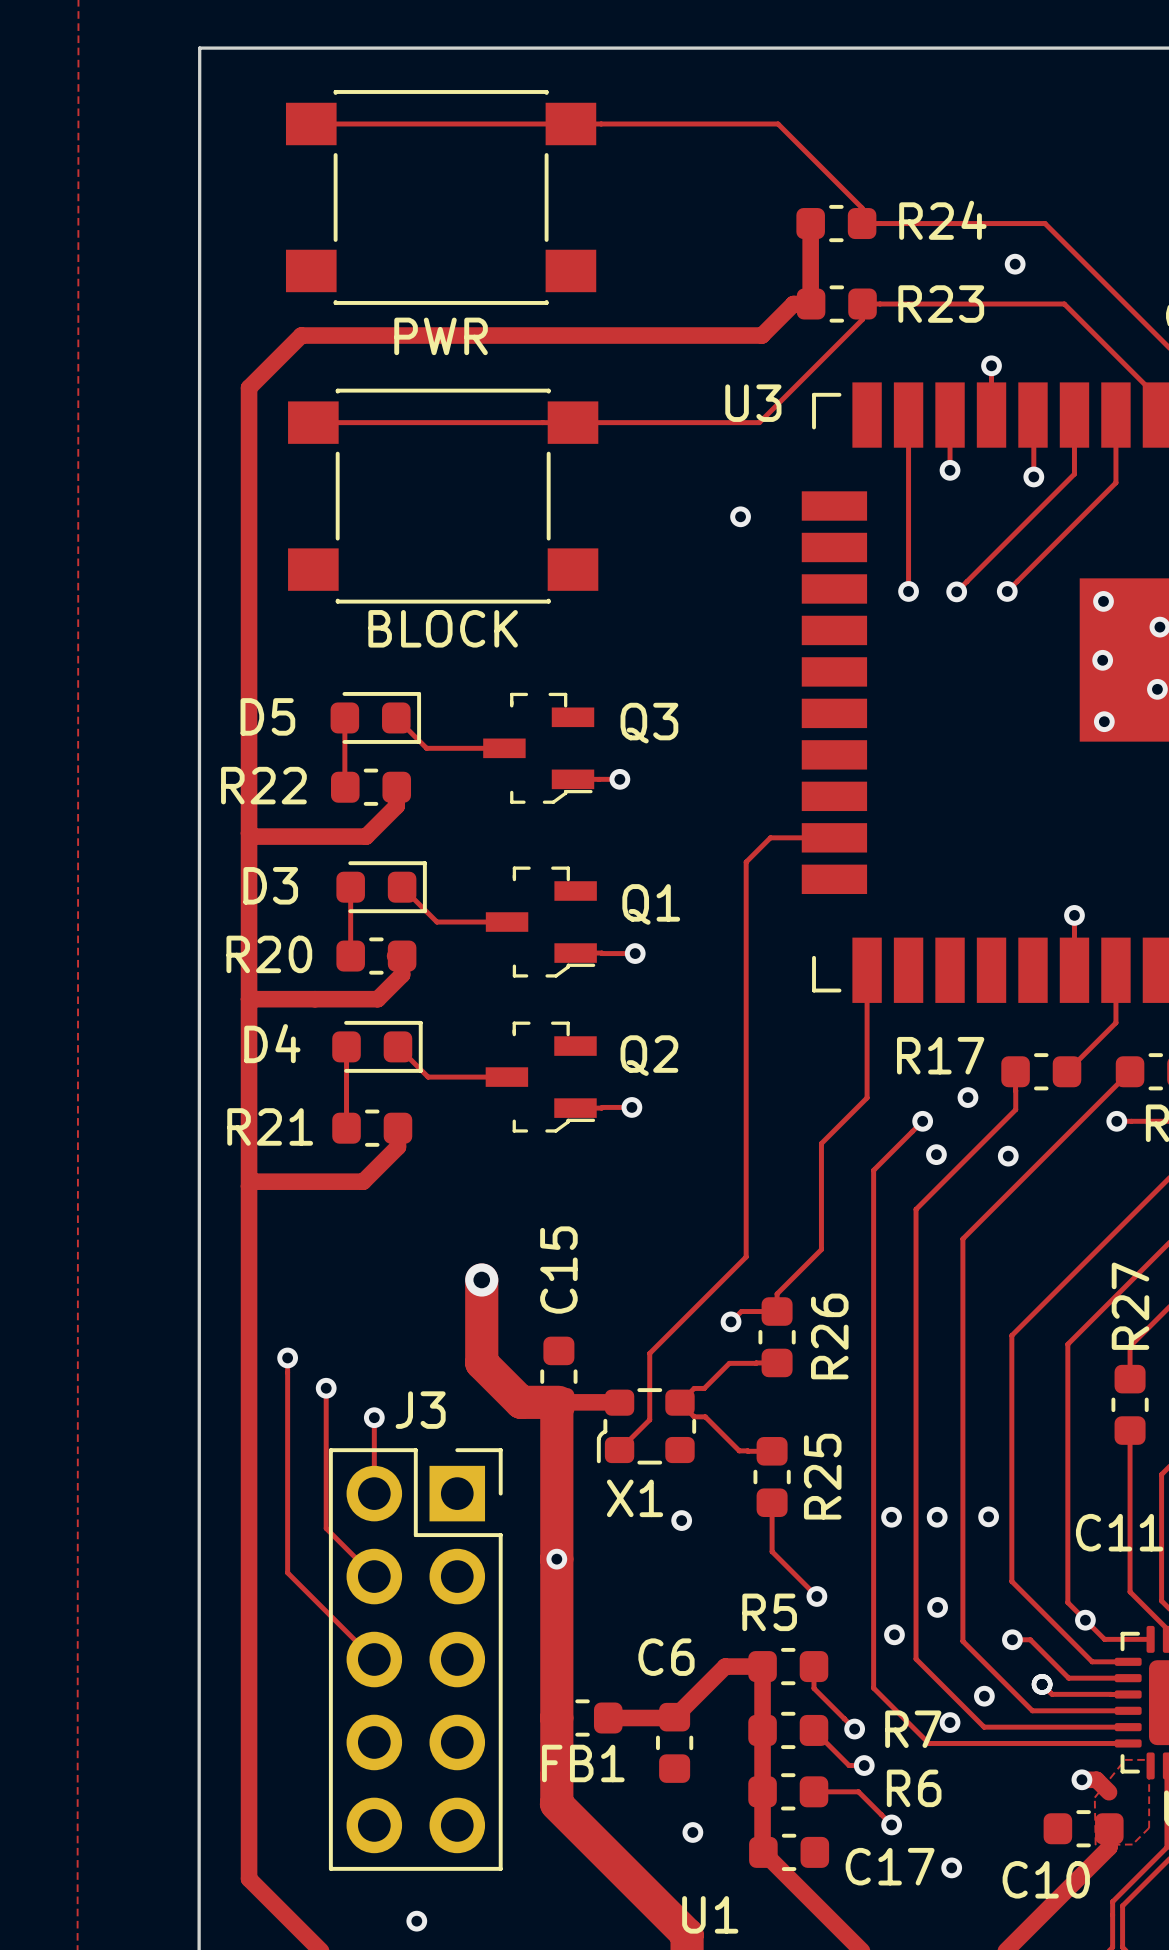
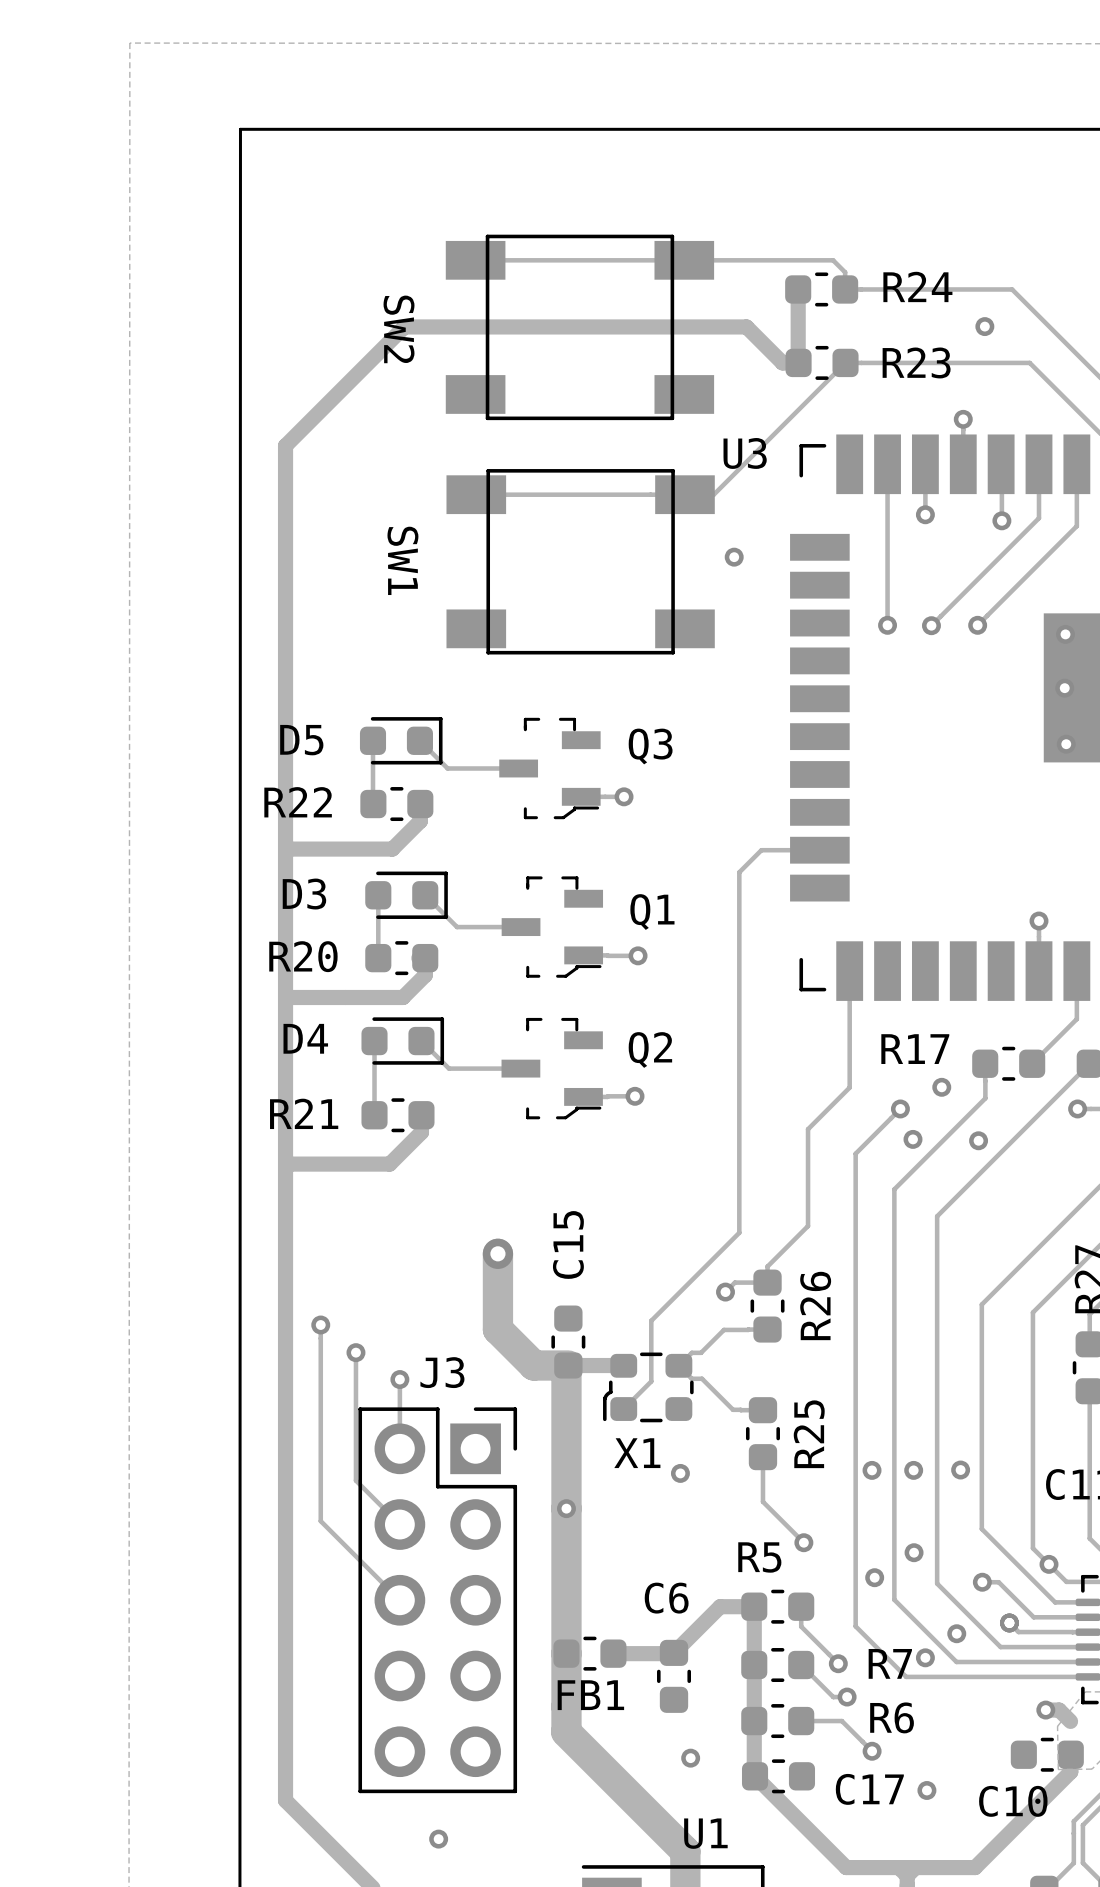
track: (311, 123) (778, 123) (862, 208) -> (475, 260) (833, 260) (845, 272) (845, 275)
part: (441, 197) -> none
SW2: none -> (579, 327)
track: (793, 304) (762, 335) (301, 335) (249, 387) (249, 394) -> (782, 362) (746, 326) (404, 326) (285, 445)
track: (862, 304) (862, 319) (759, 422) (313, 422) -> (845, 362) (713, 494) (476, 494)
text: PWR (441, 336) -> none
part: (443, 496) -> none
SW1: none -> (580, 561)
text: BLOCK (443, 628) -> none

